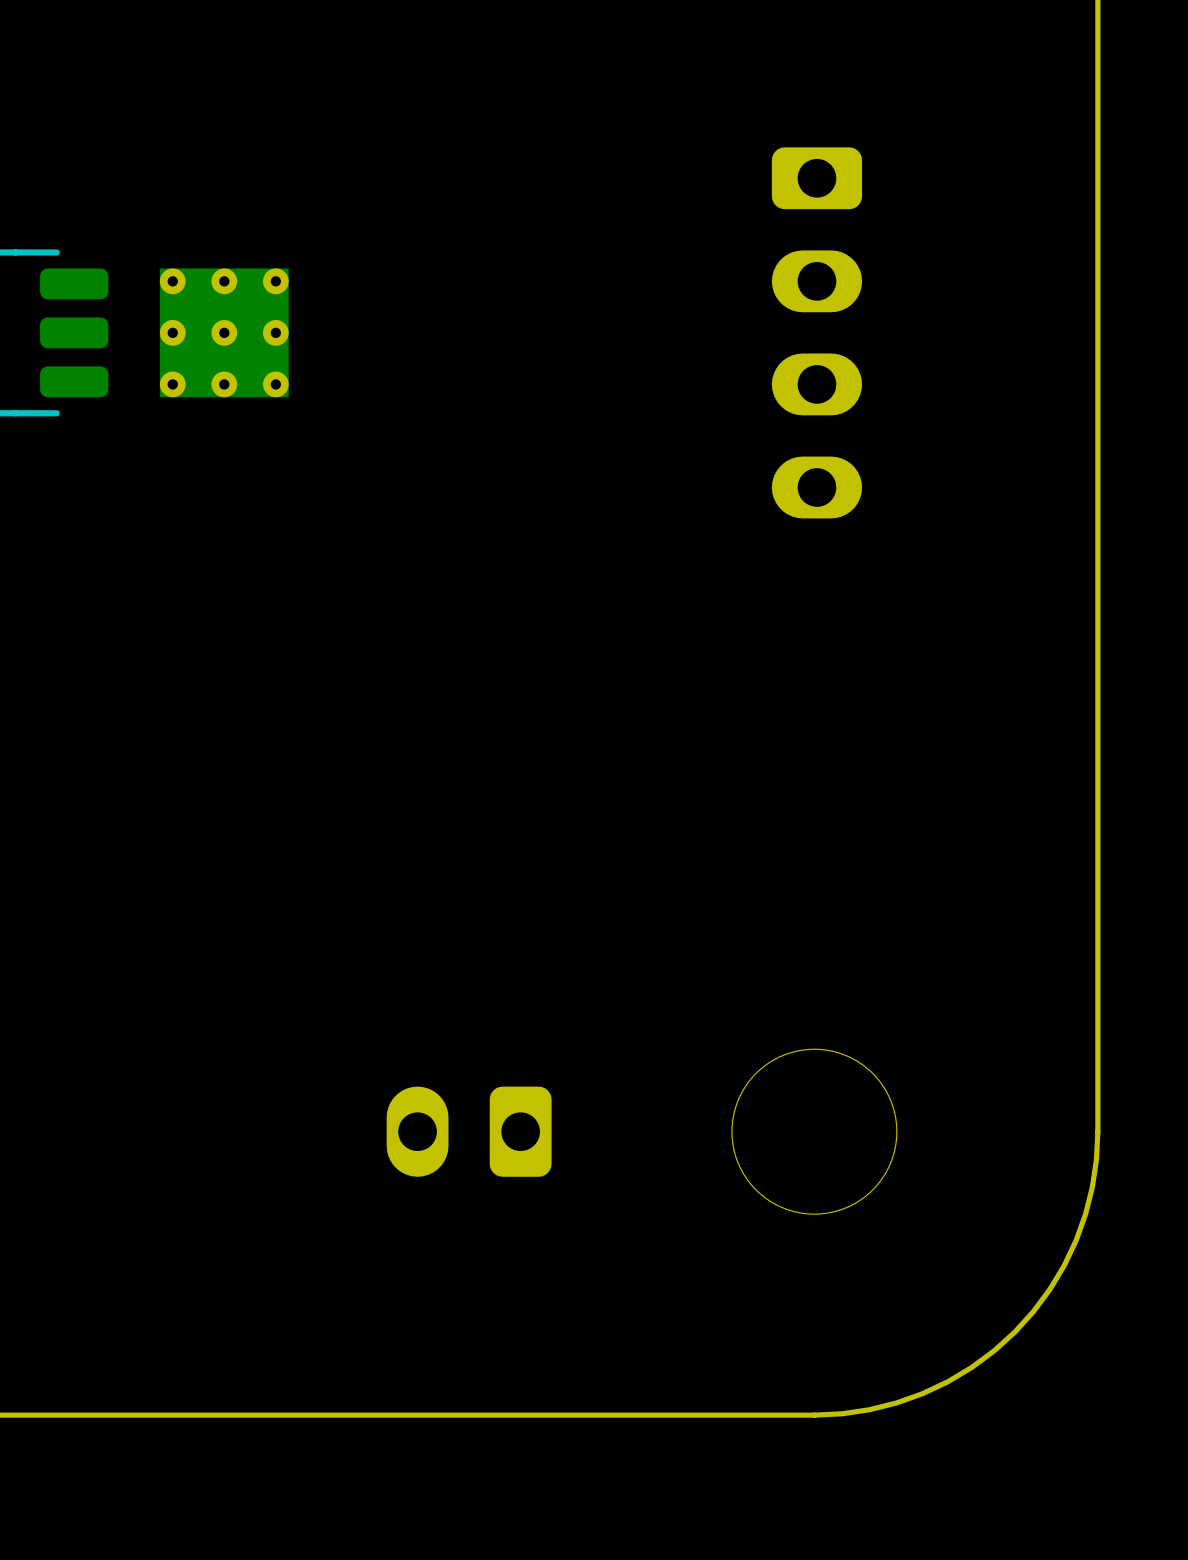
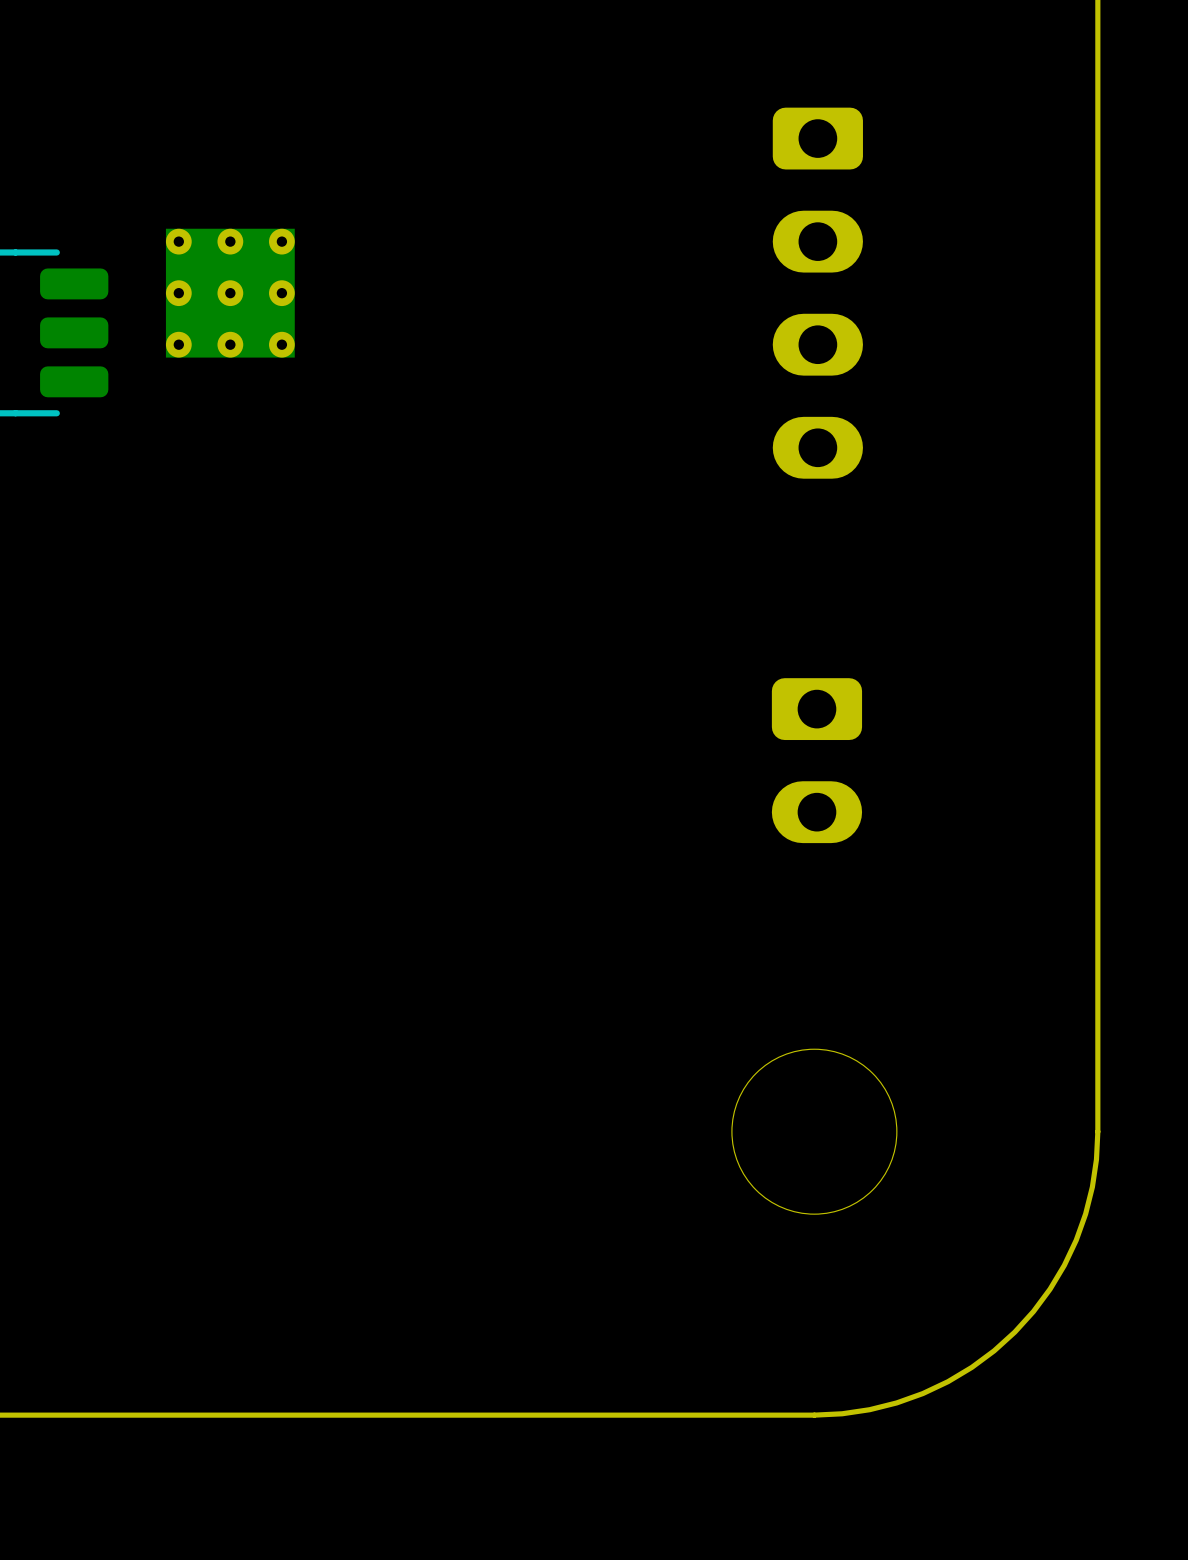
part position: (224, 332) -> (230, 293)
part position: (816, 332) -> (817, 293)
part rotation: 0° (469, 1131) -> 90° counterclockwise (816, 760)
part position: (469, 1131) -> (816, 760)

